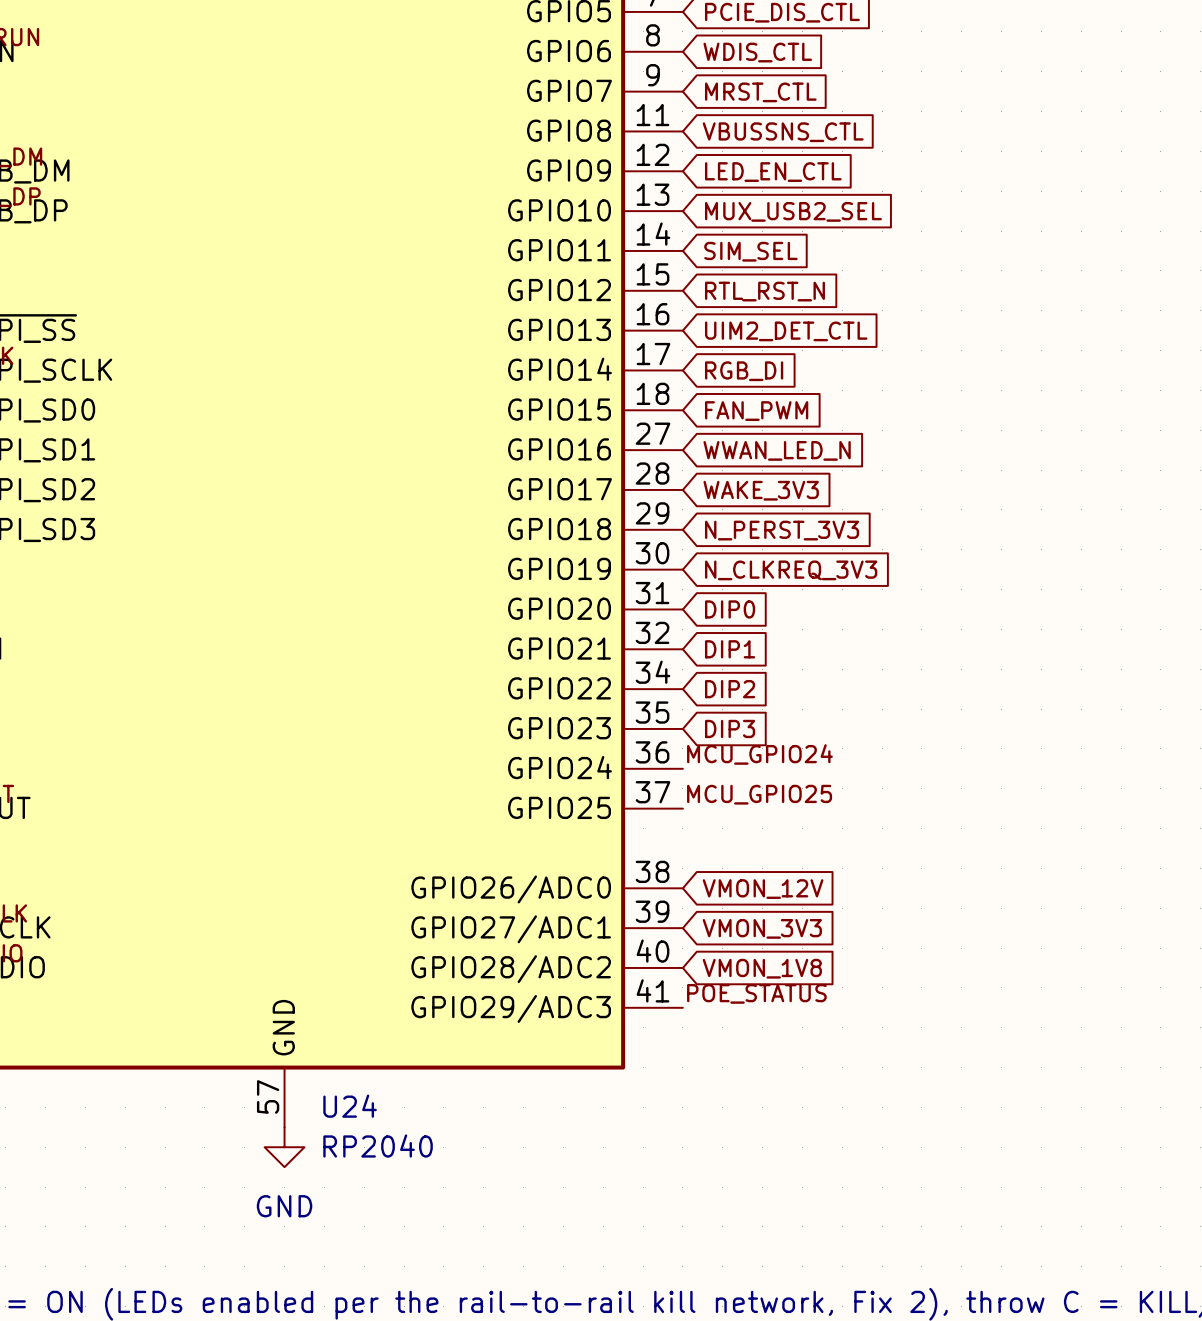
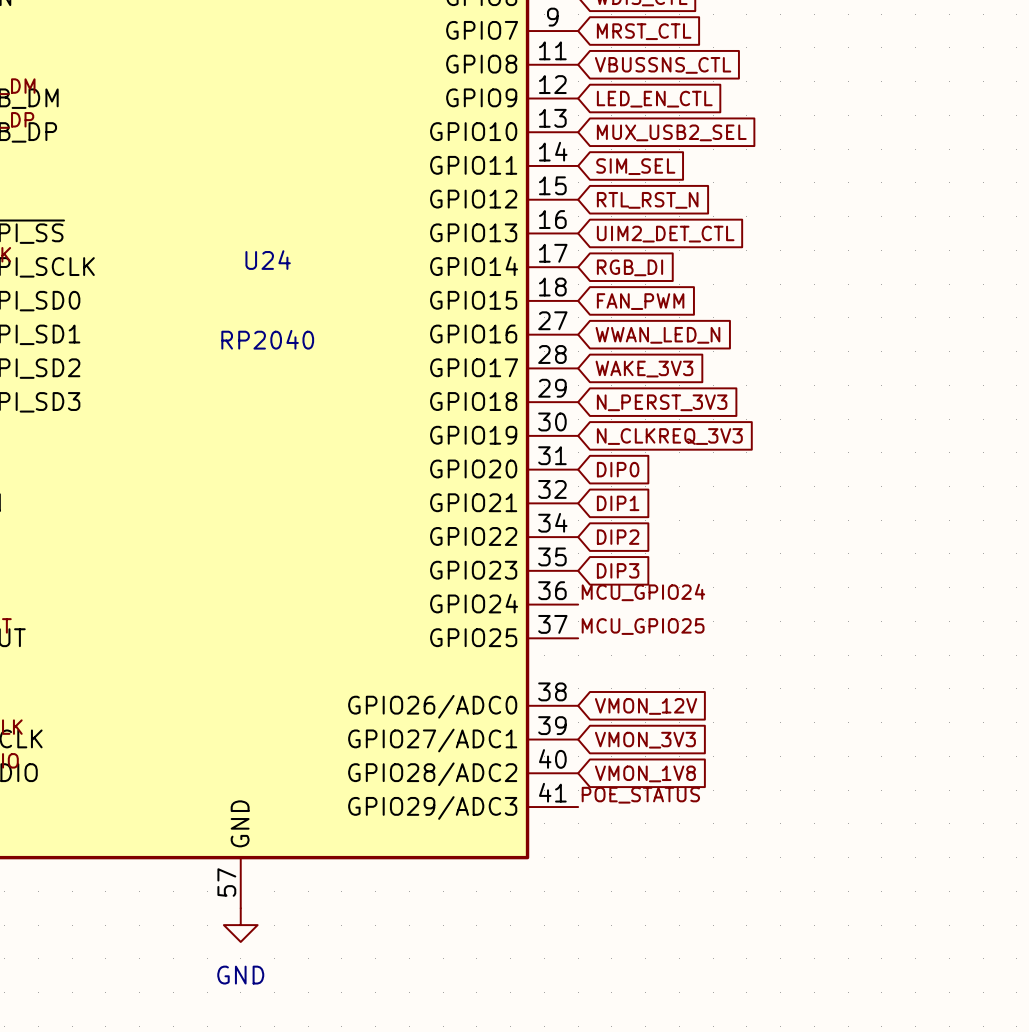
U24 name position: U24 (350, 1106) -> U24 (268, 260)
U24 value position: RP2040 (378, 1146) -> RP2040 (267, 339)

